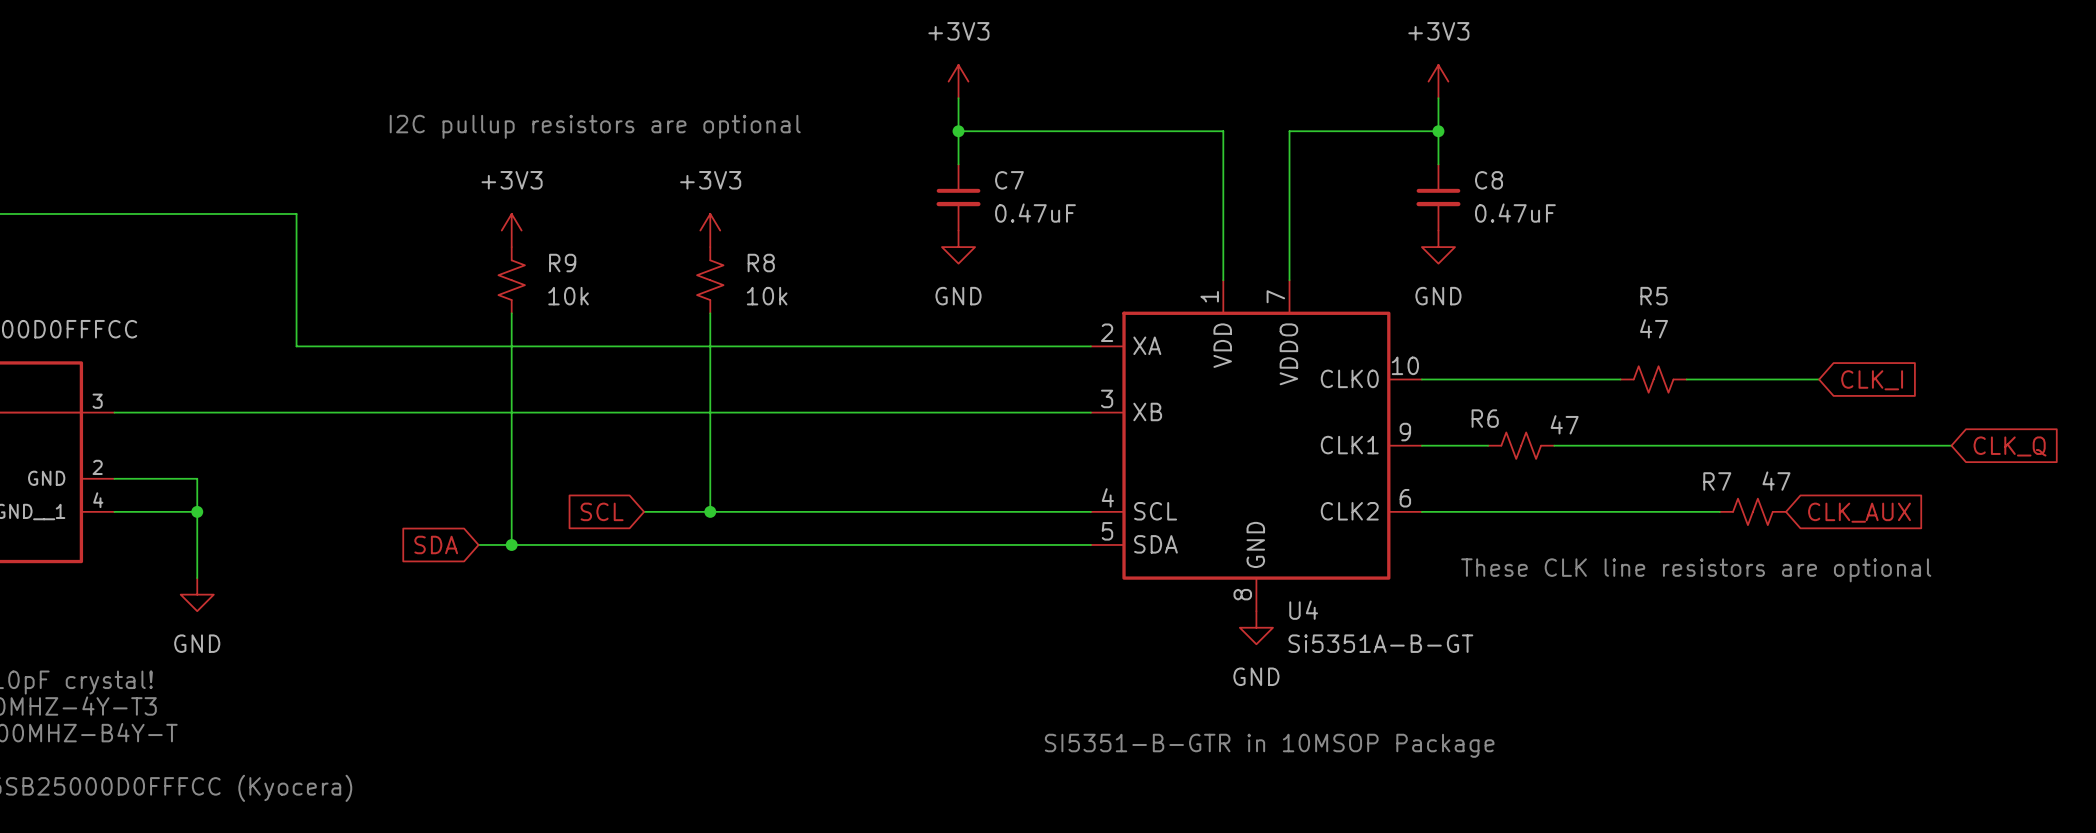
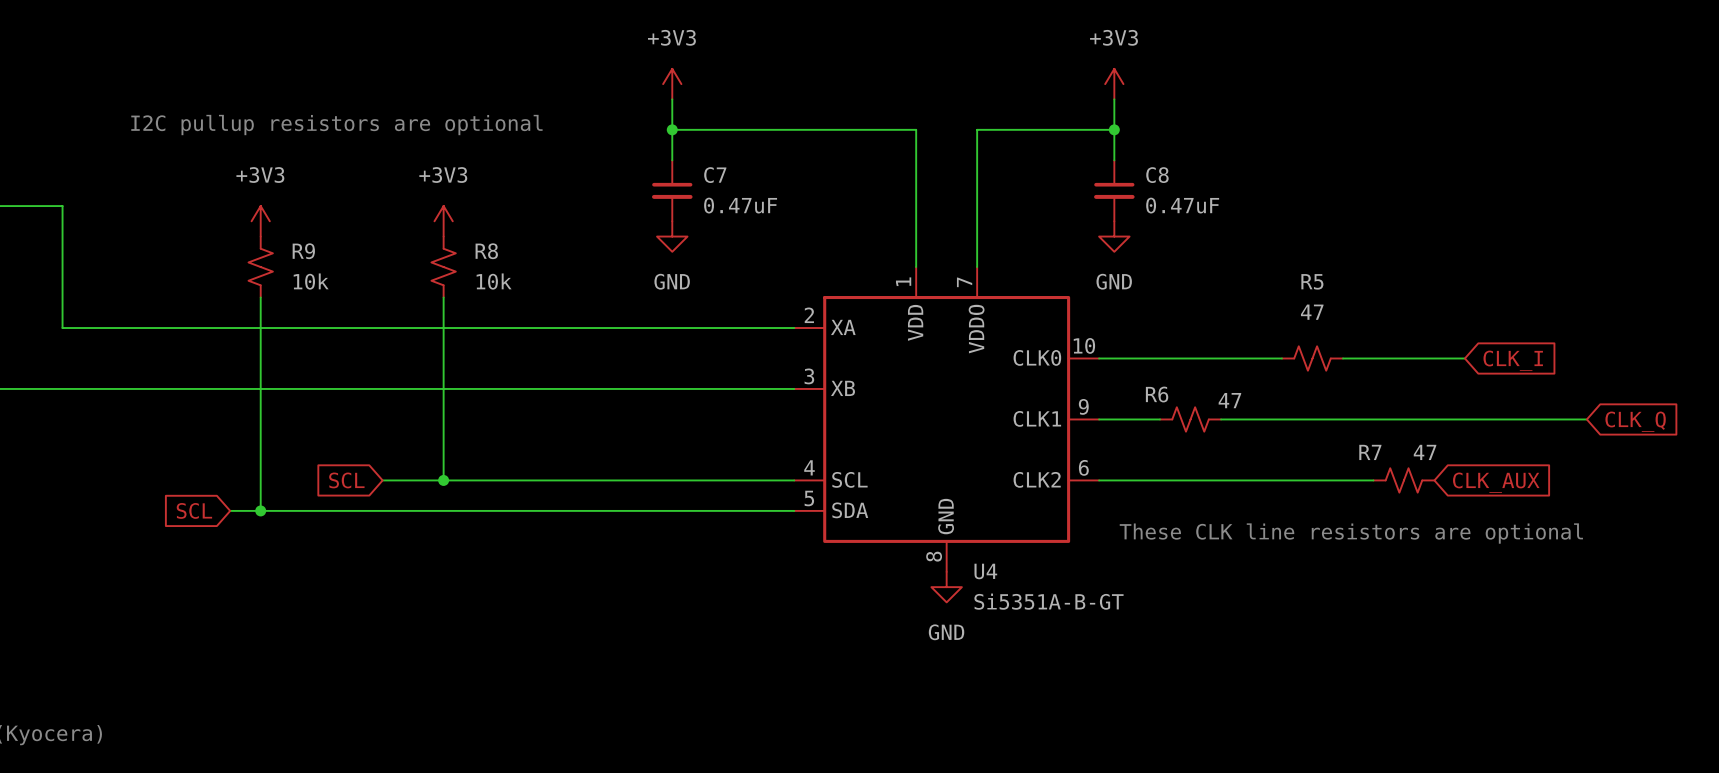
global label: SDA (436, 544) -> SCL (194, 510)
text: SI5351-B-GTR in 10MSOP Package (1269, 745) -> none

